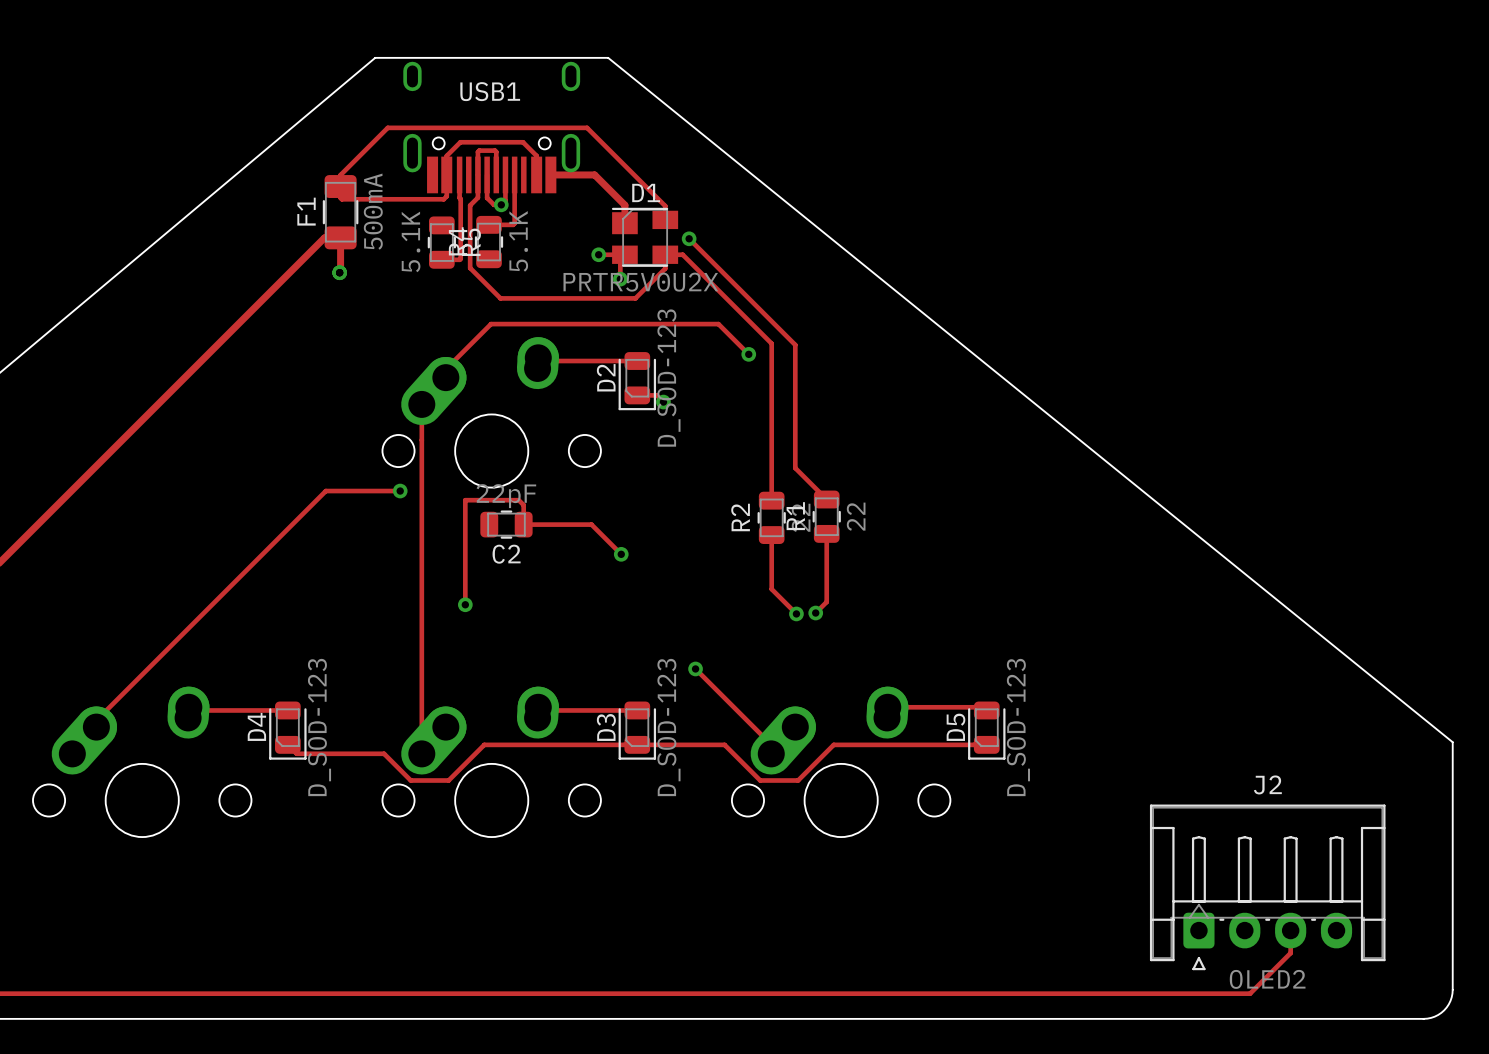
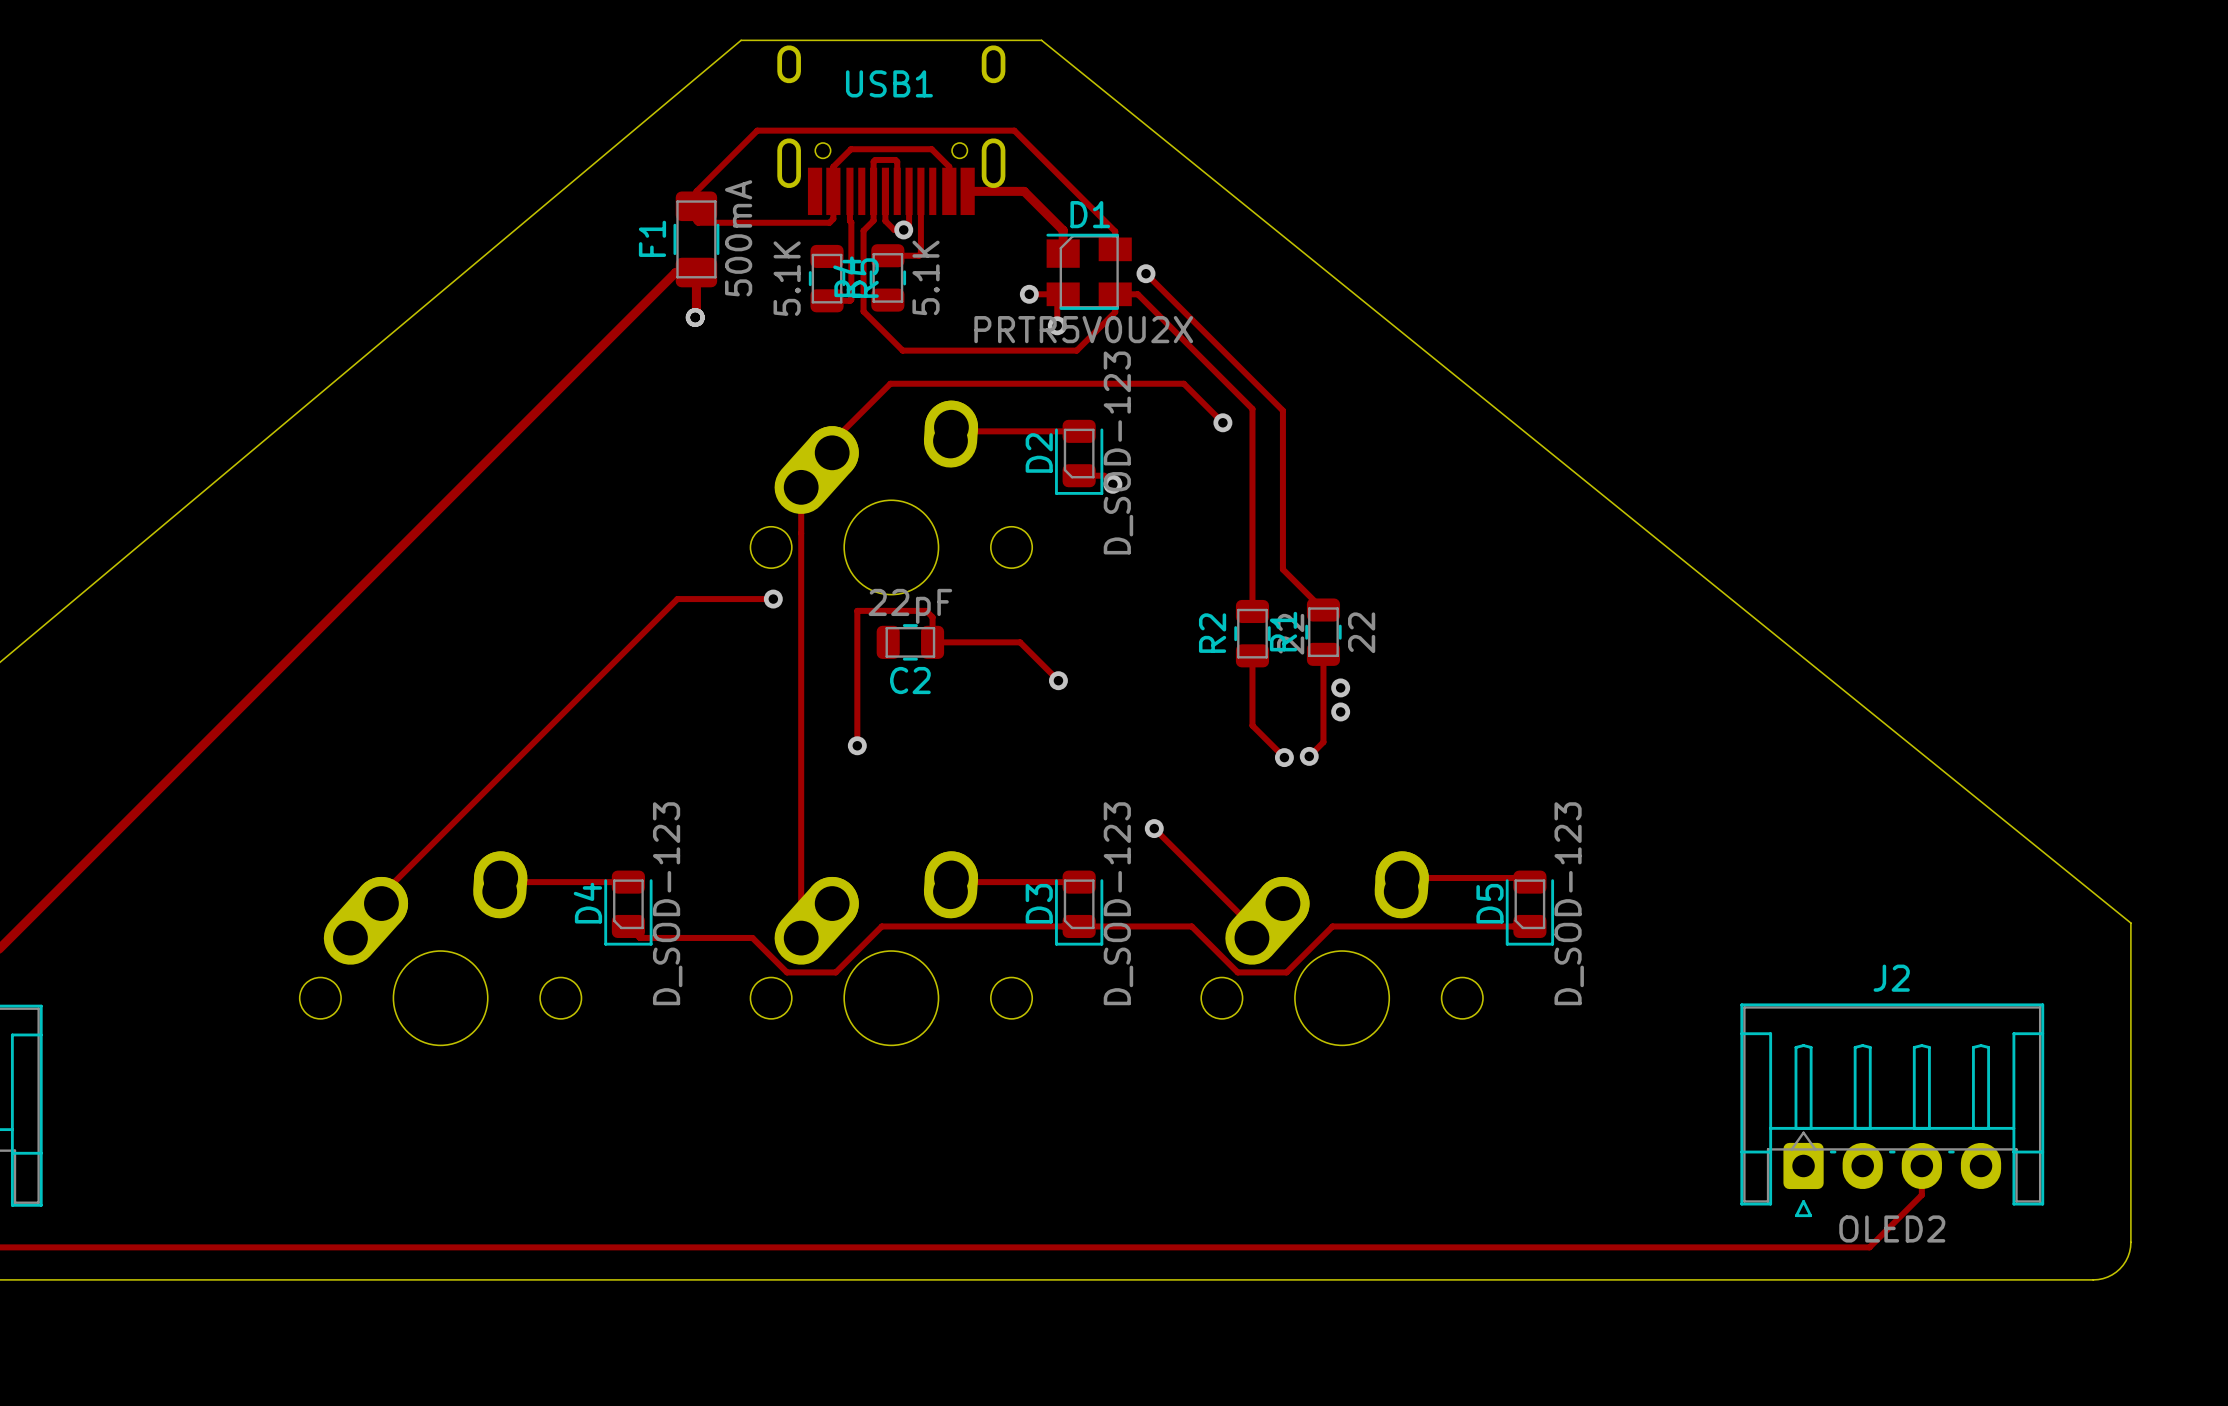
via: none -> (1340, 687)
via: none -> (1340, 711)

